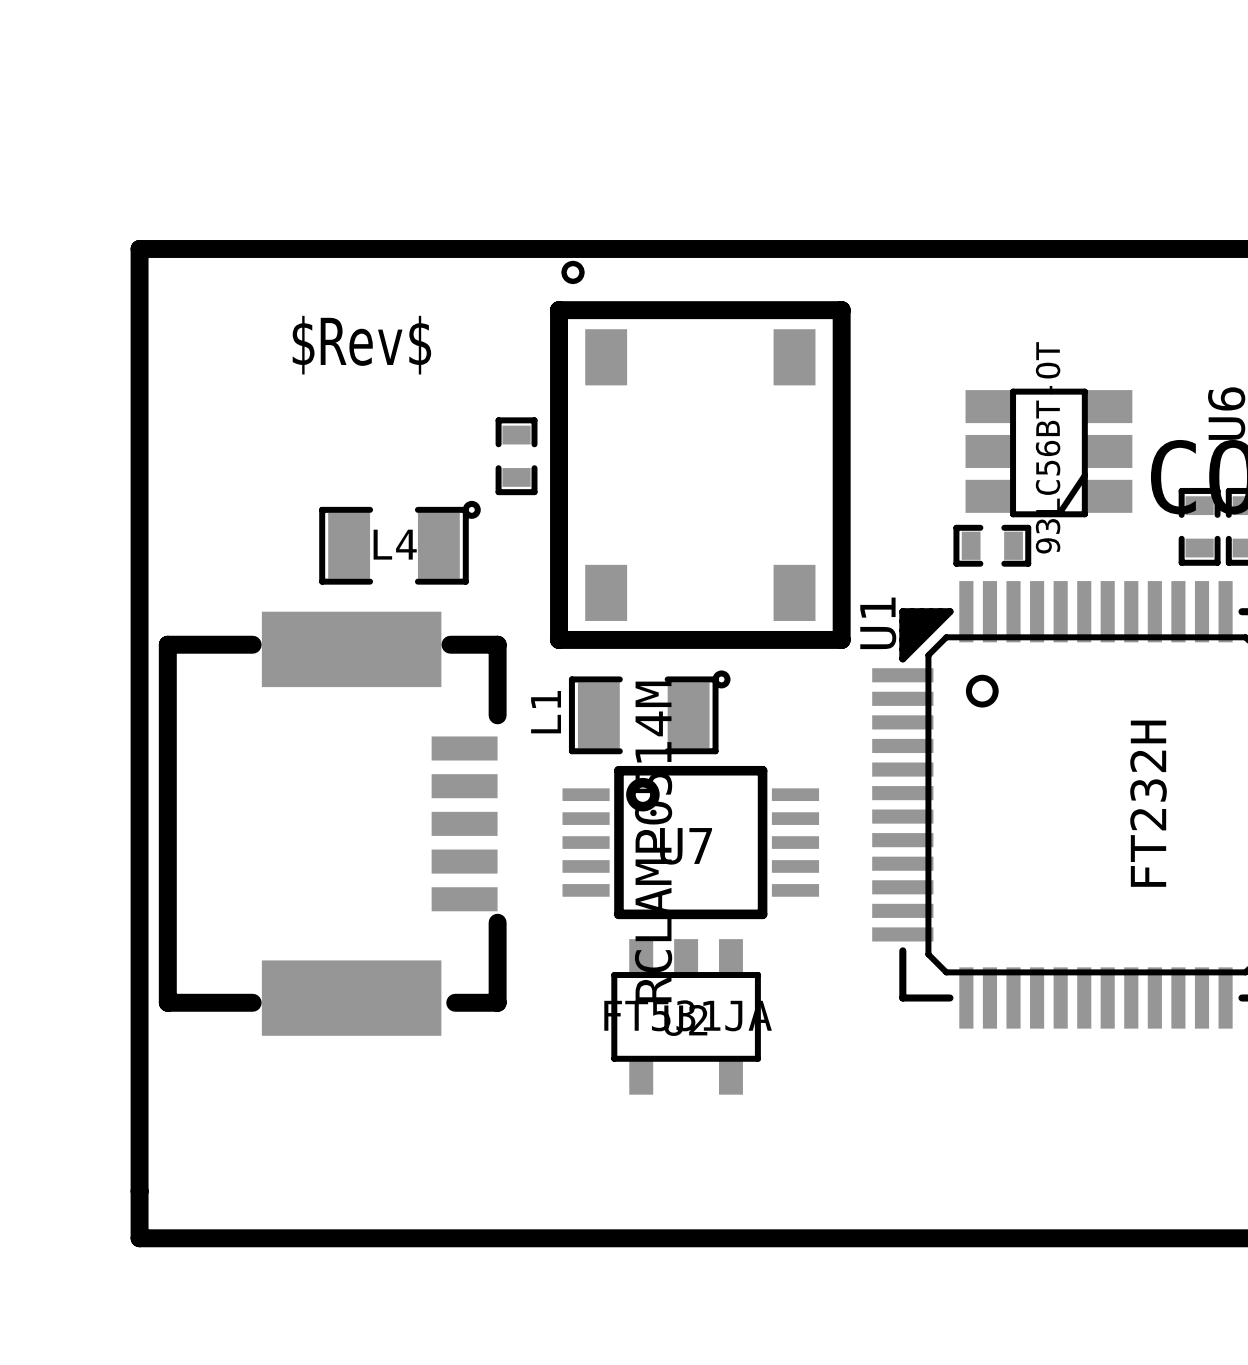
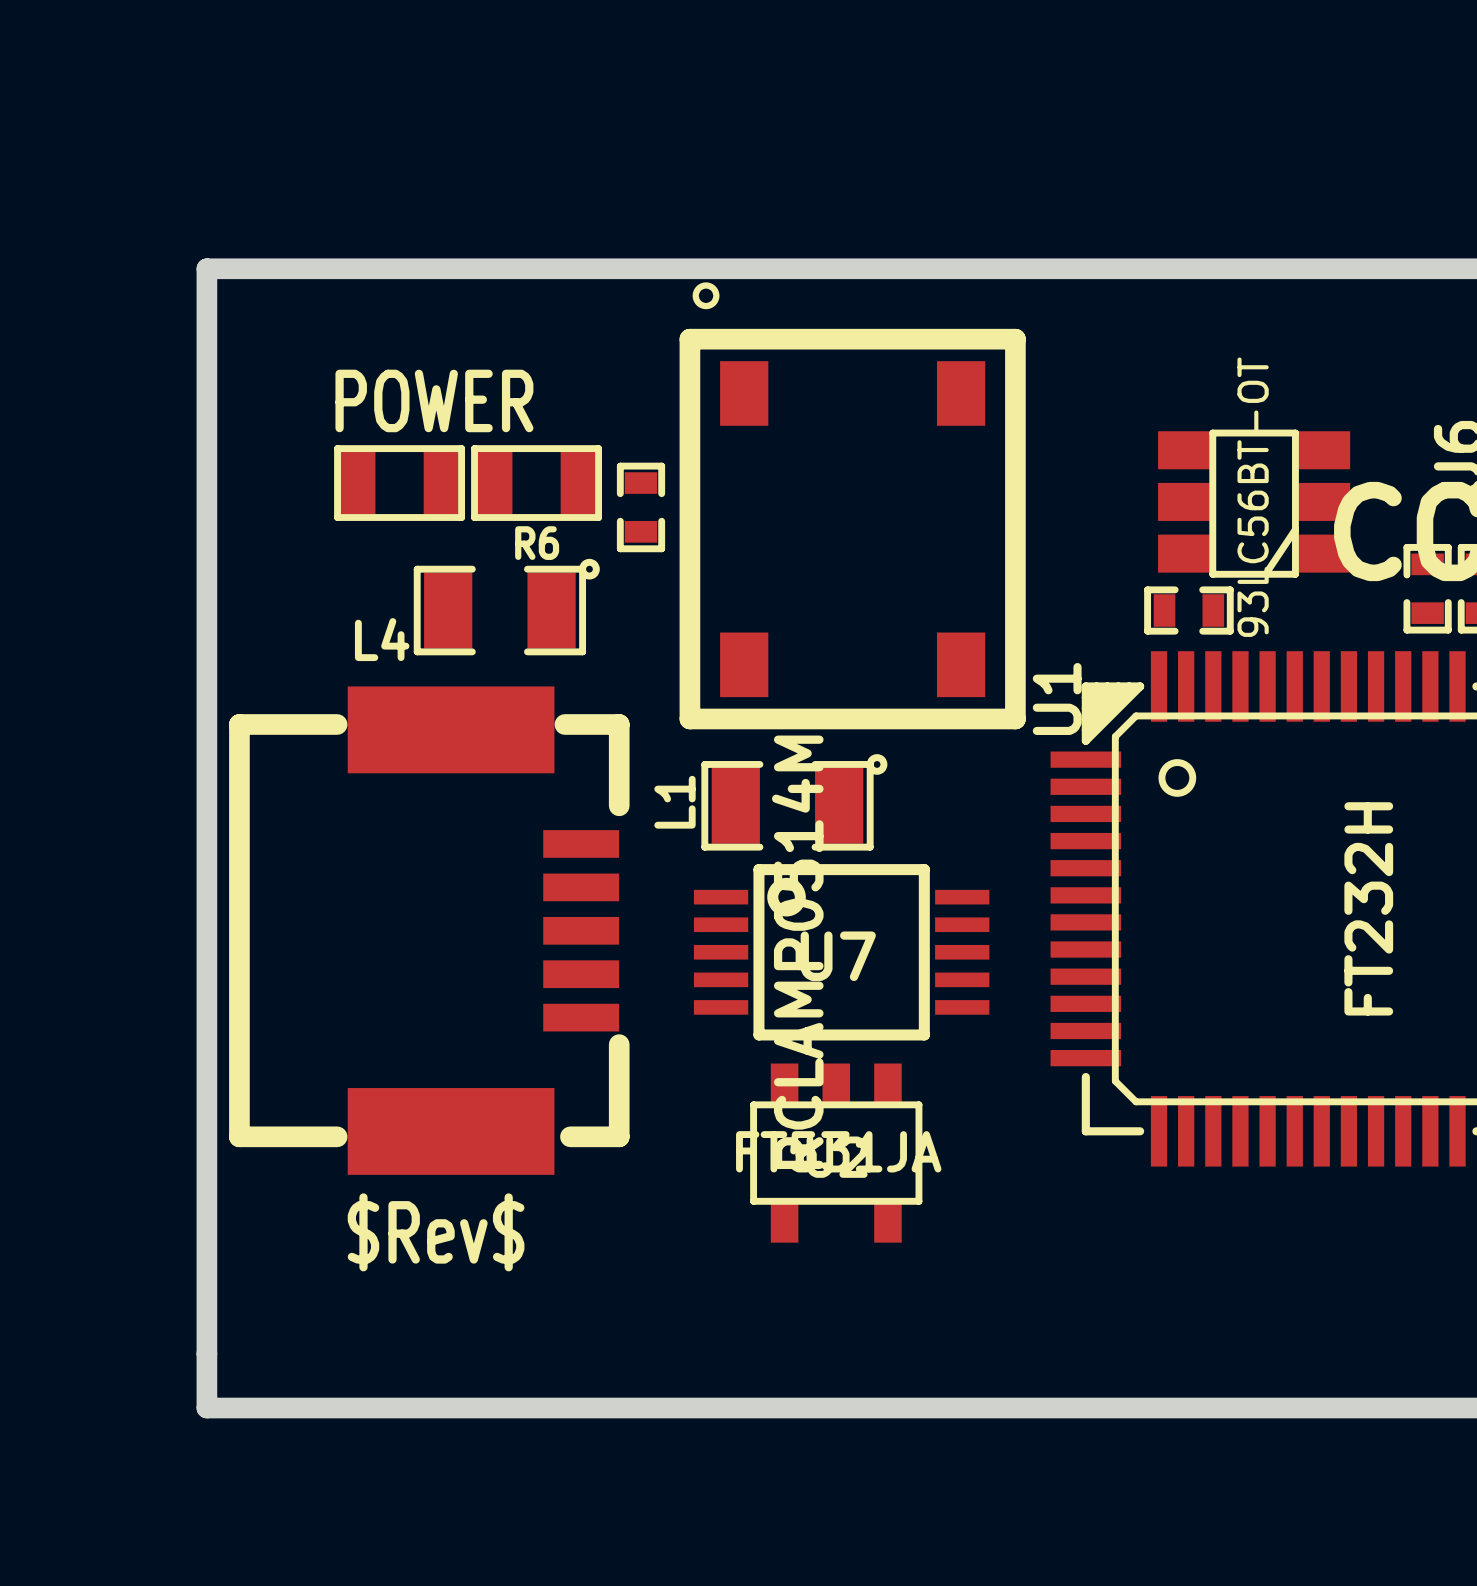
text position: $Rev$ (361, 345) -> $Rev$ (436, 1232)
text: none -> POWER (434, 400)
part: none -> (399, 483)
R6: none -> (536, 483)
L4 name position: L4 (395, 544) -> L4 (382, 639)

